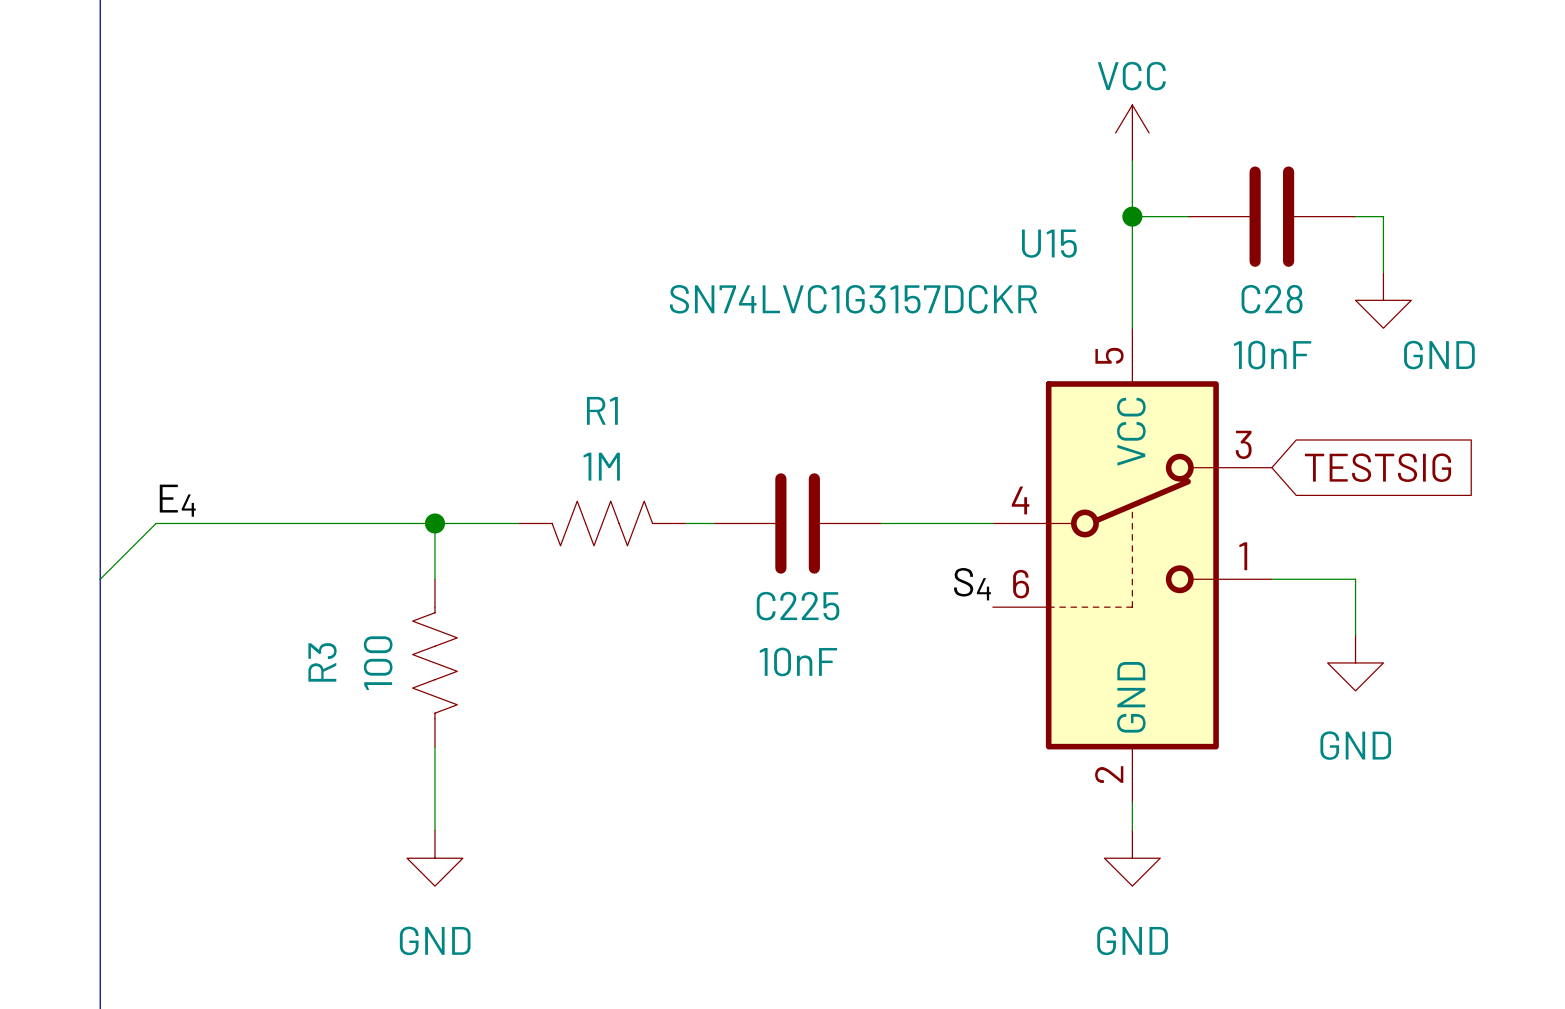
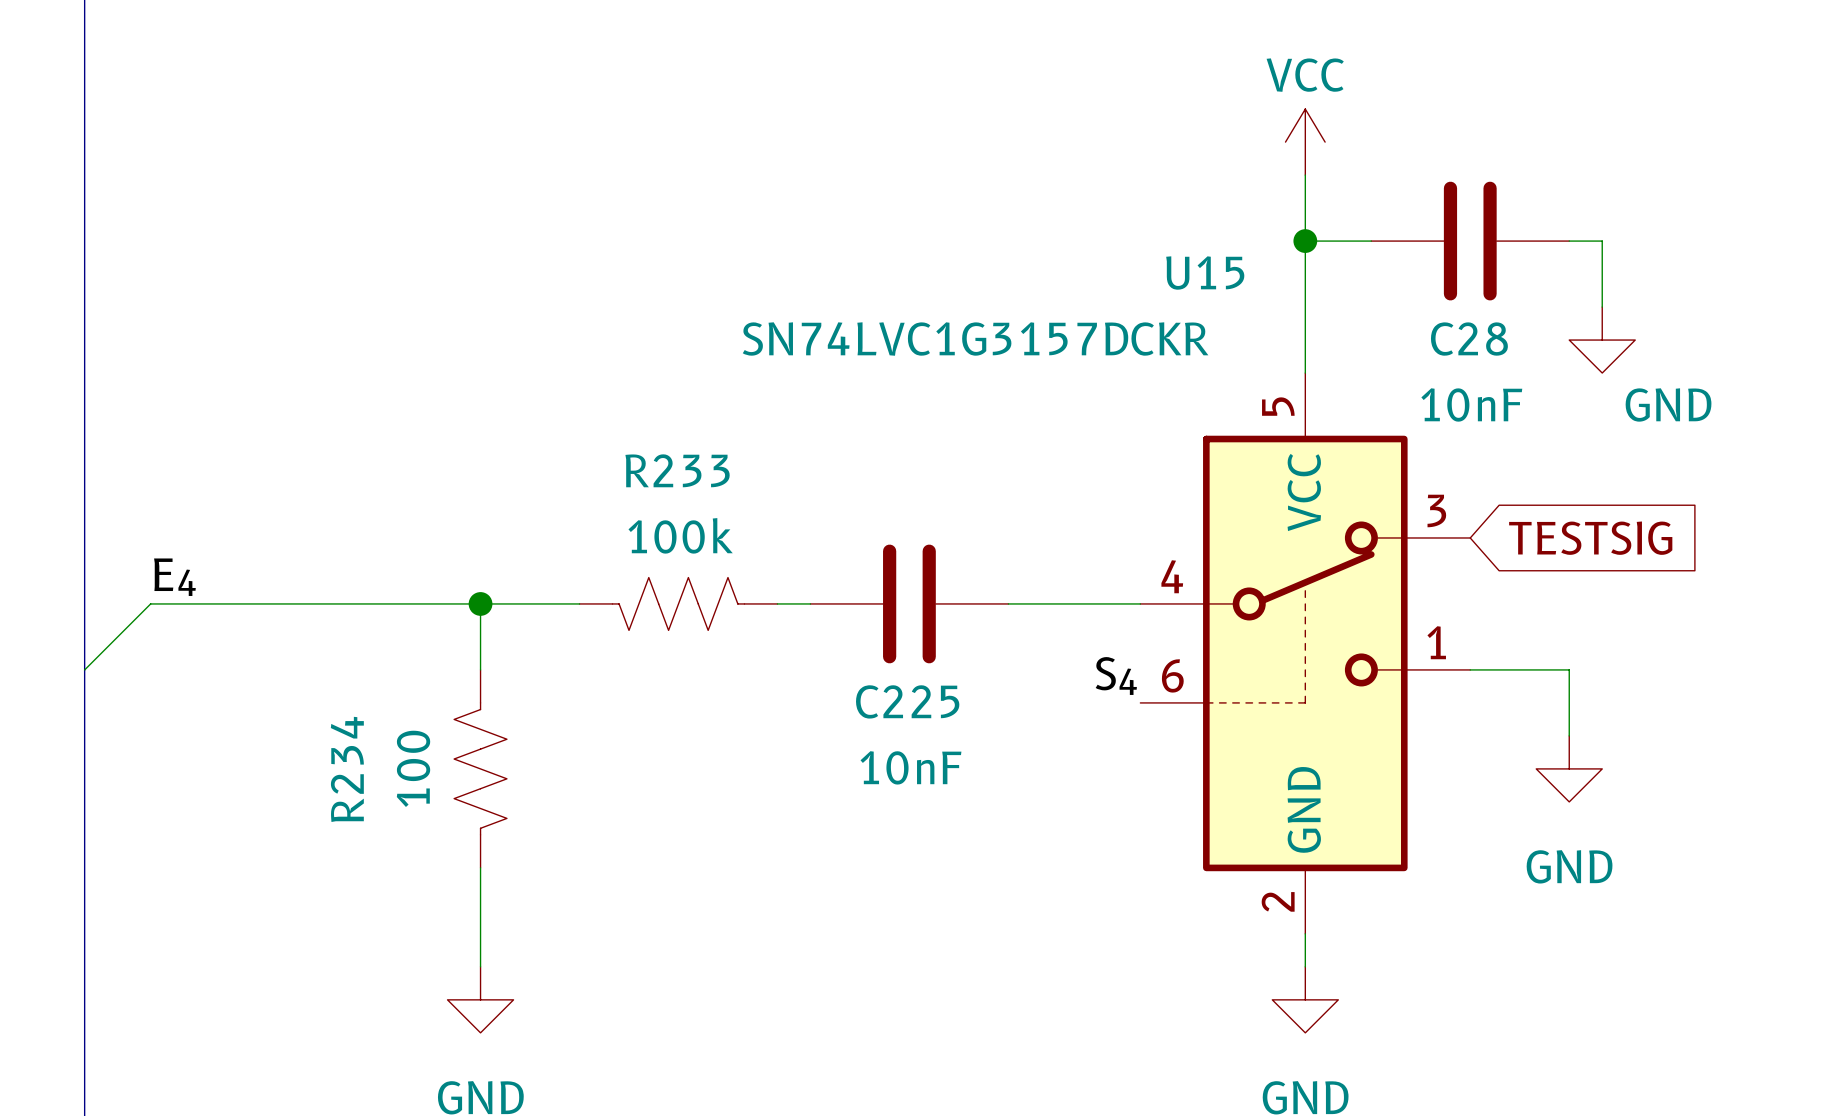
R1 name: R1 (602, 410) -> R233 (677, 470)
R1 value: 1M (601, 466) -> 100k (680, 535)
R3 name: R3 (322, 662) -> R234 (347, 769)

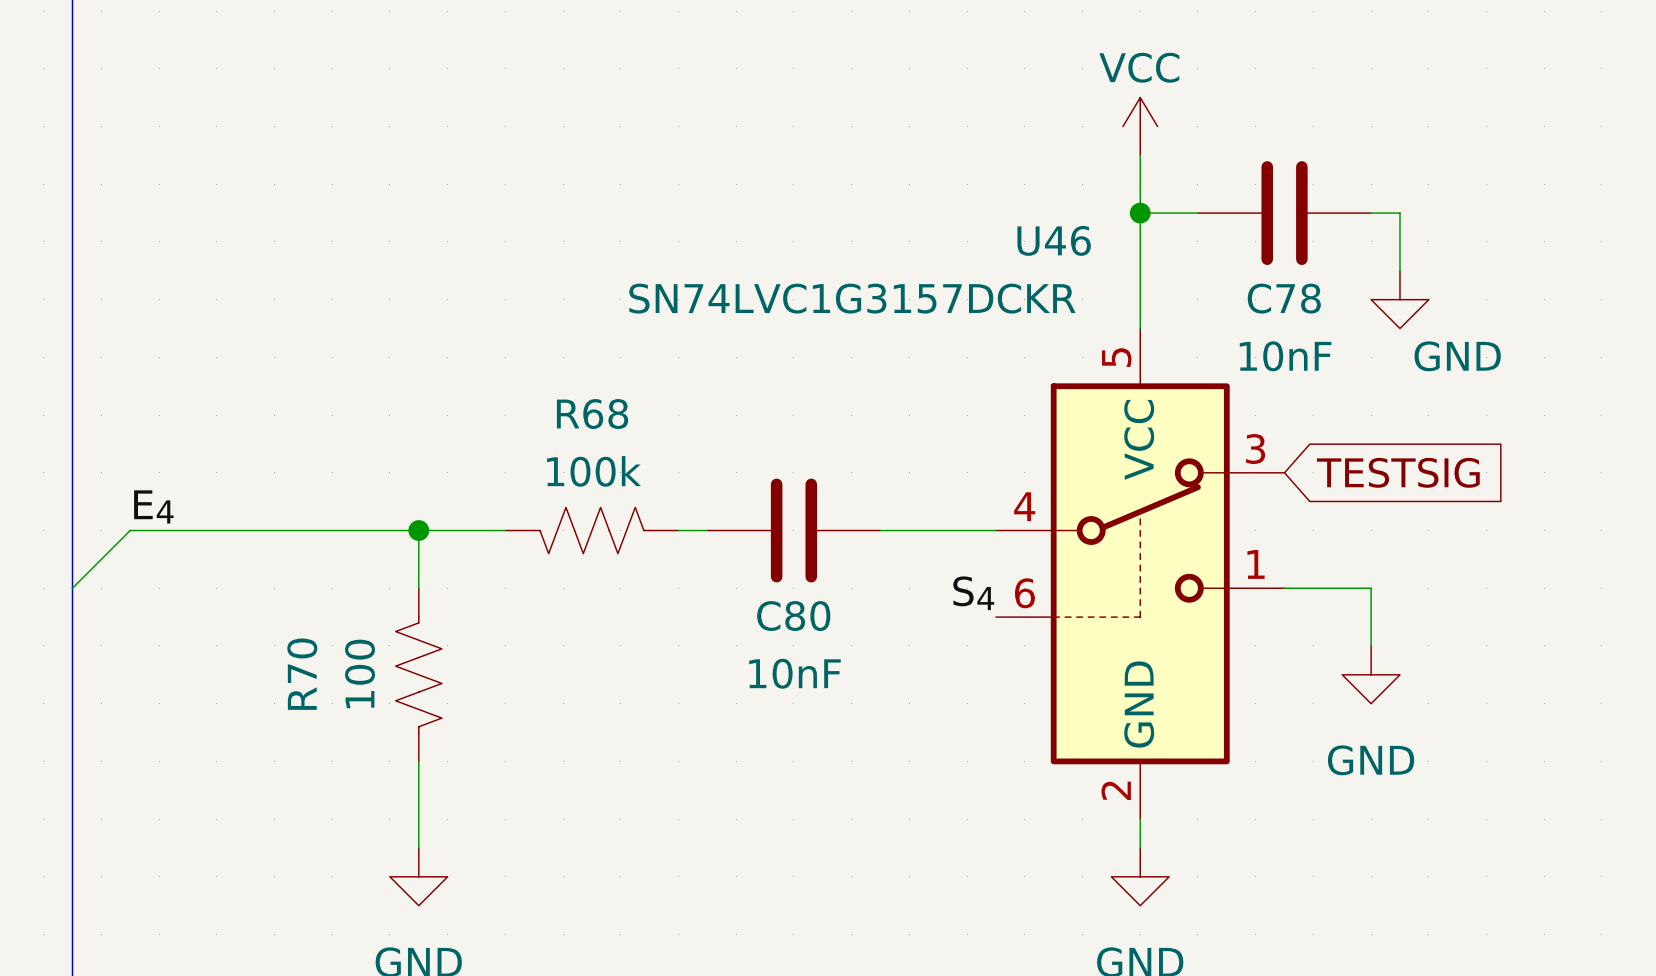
U15 name: U15 (1205, 273) -> U46 (1054, 240)
C28 name: C28 (1469, 339) -> C78 (1284, 298)
R233 name: R233 (677, 470) -> R68 (592, 414)
C225 name: C225 (907, 701) -> C80 (793, 616)
R234 name: R234 (347, 769) -> R70 (302, 674)

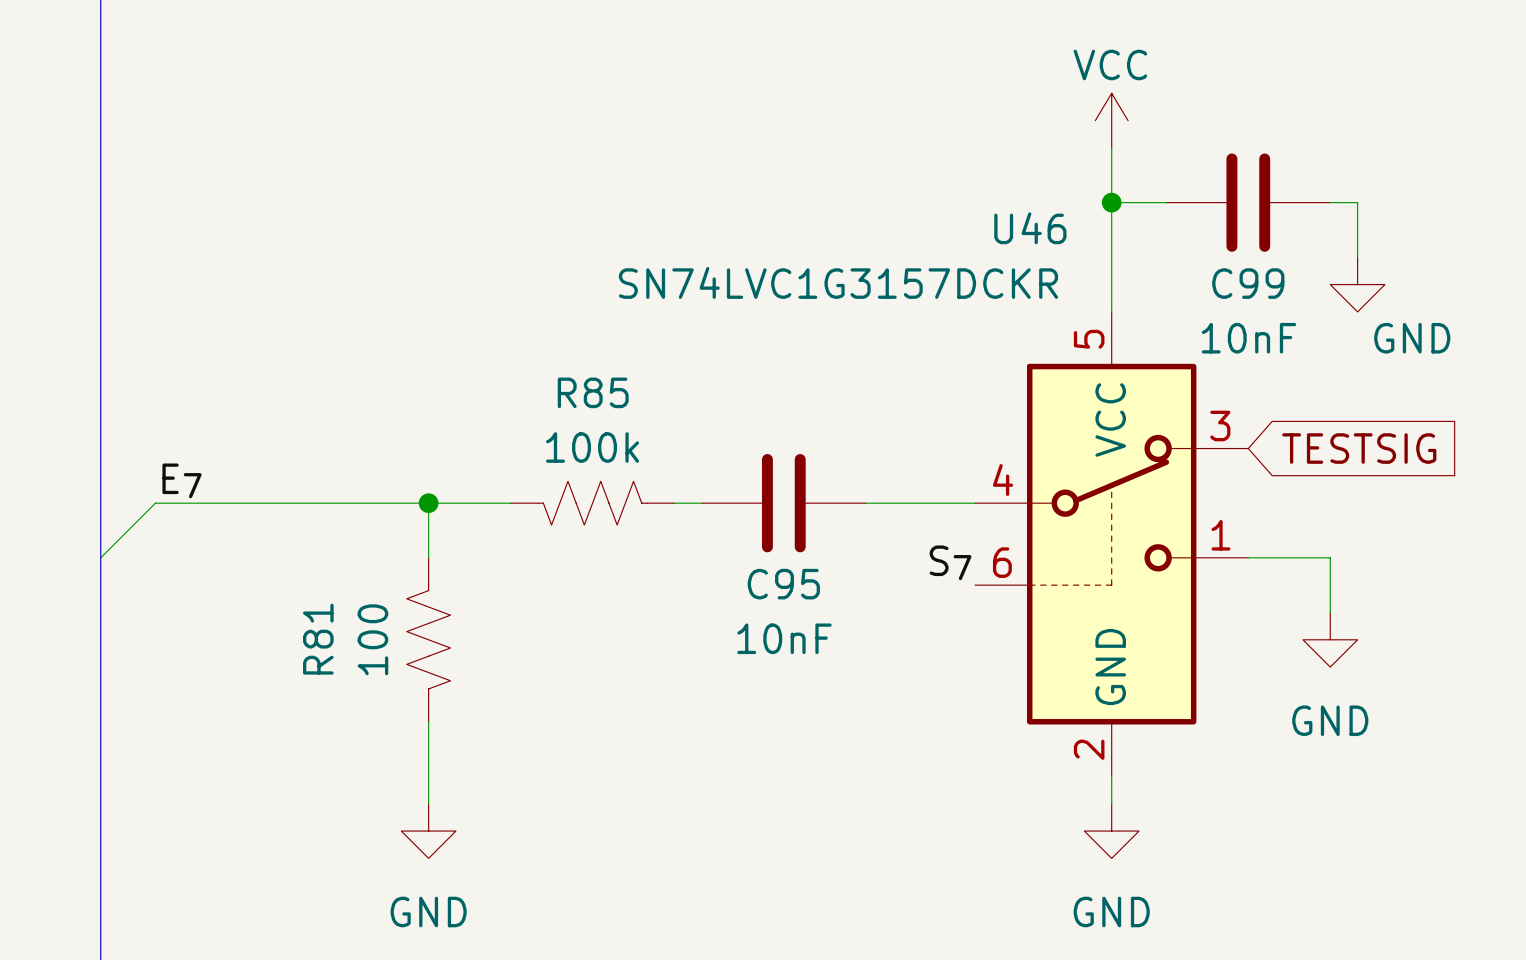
C78 name: C78 (1284, 298) -> C99 (1248, 283)
R68 name: R68 (592, 414) -> R85 (593, 392)
label: E4 (153, 506) -> E7 (182, 480)
label: S4 (973, 593) -> S7 (950, 562)
C80 name: C80 (793, 616) -> C95 (783, 584)
R70 name: R70 (302, 674) -> R81 (318, 639)

